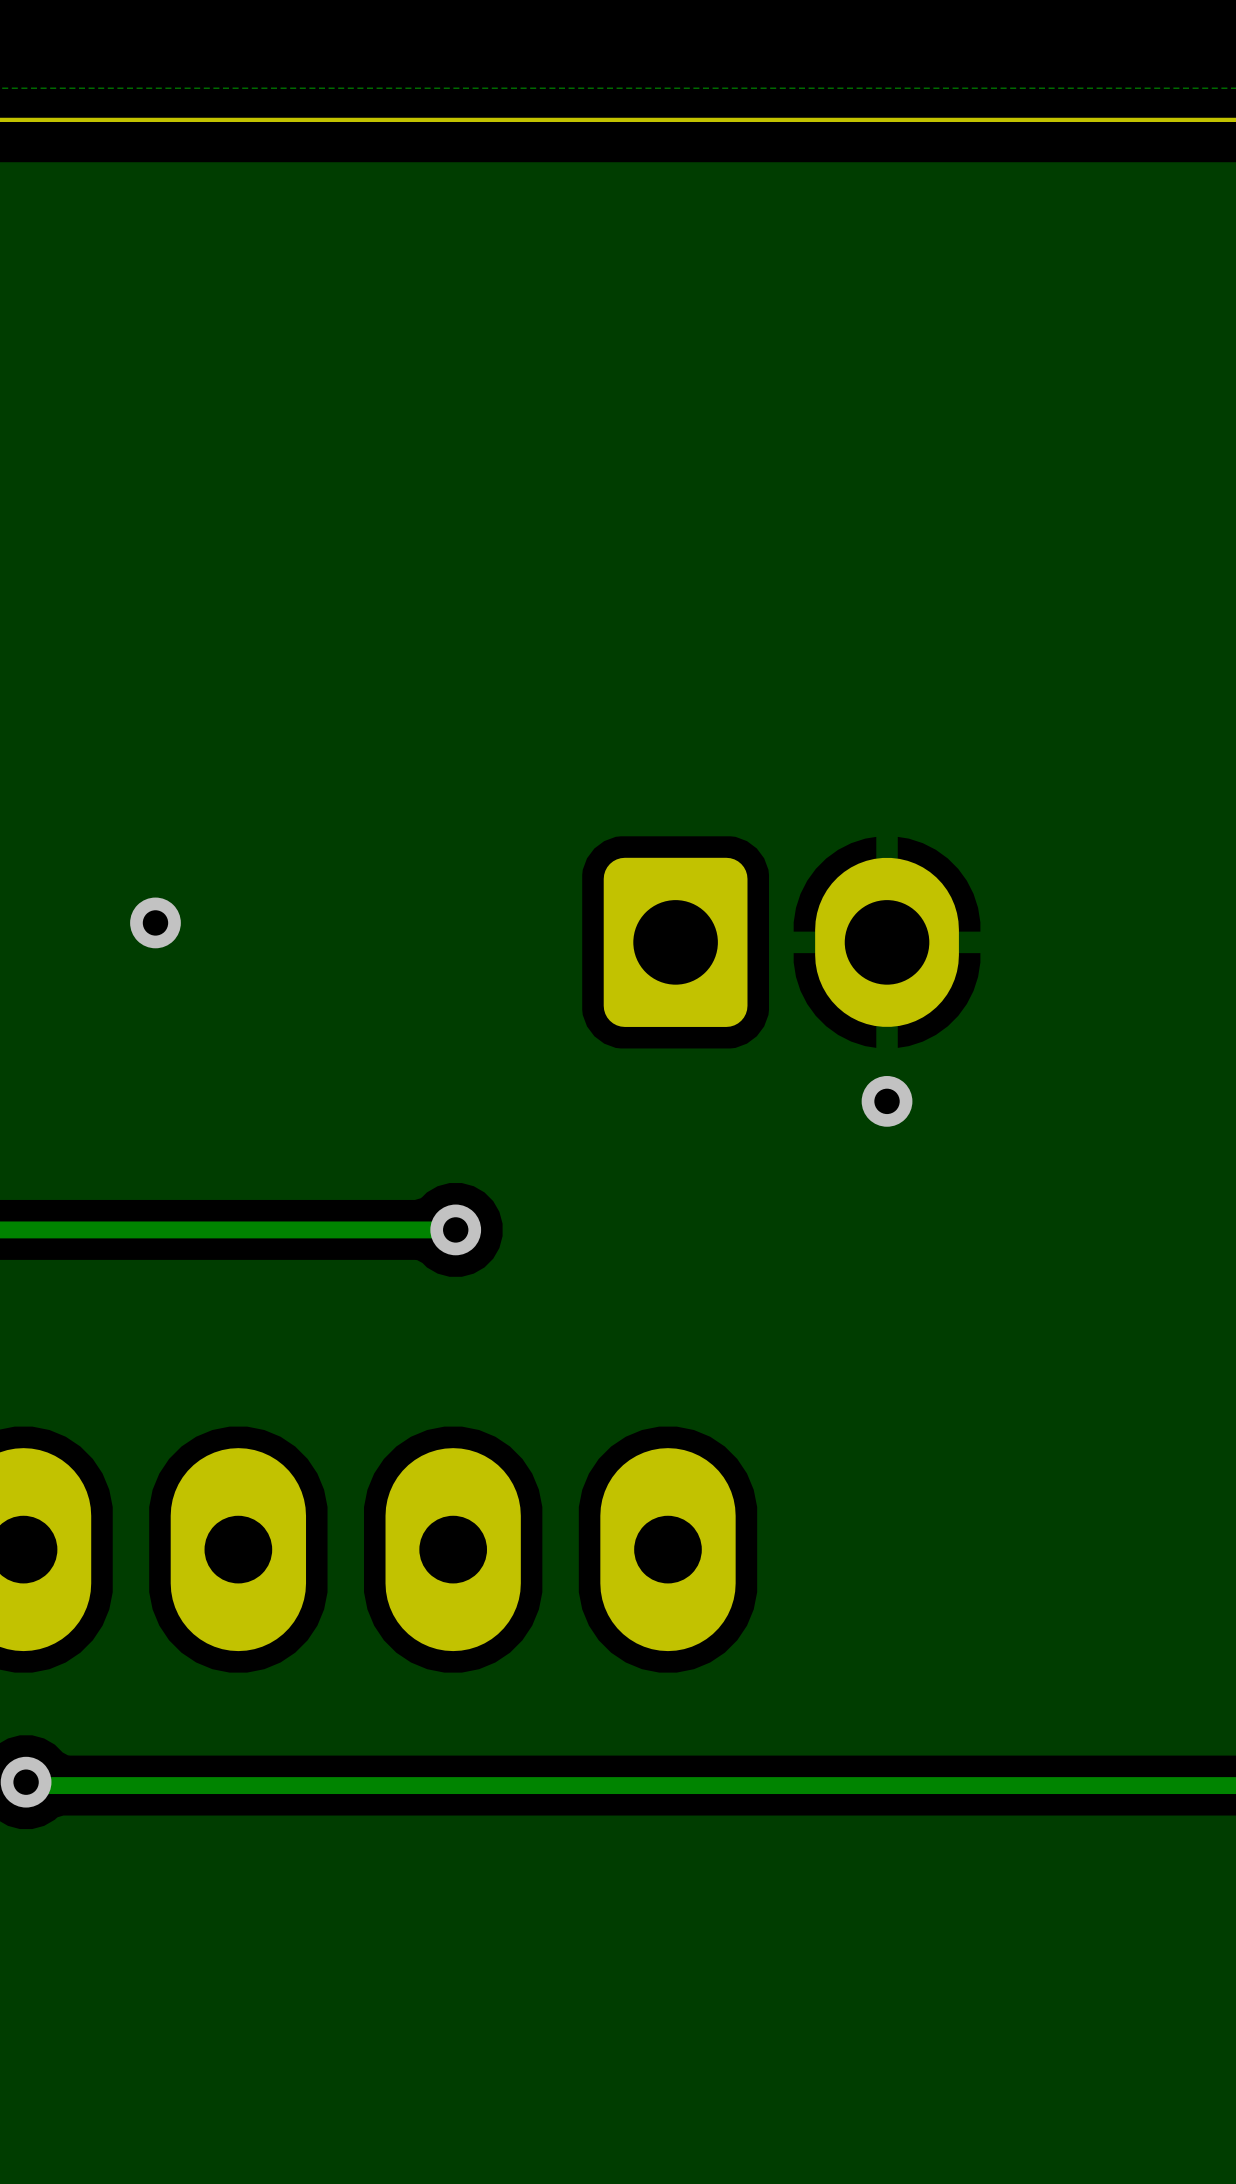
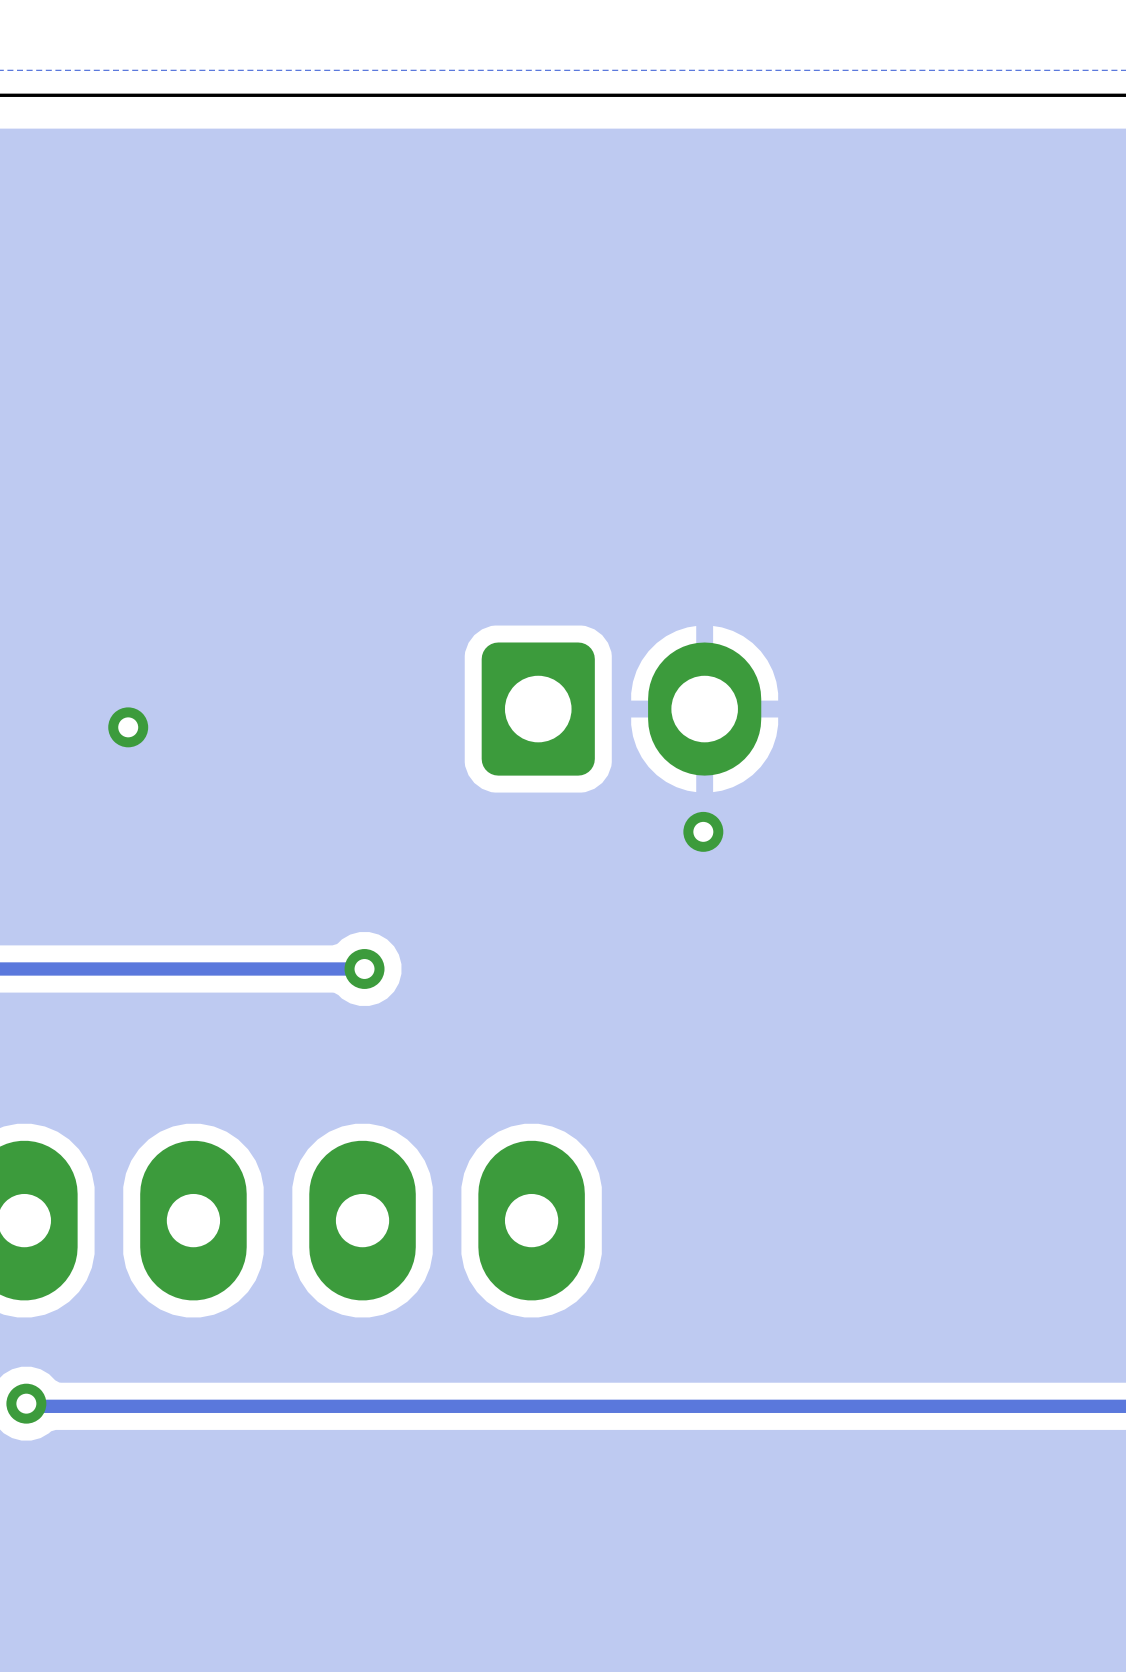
part position: (781, 942) -> (621, 709)
via position: (887, 1101) -> (703, 831)

